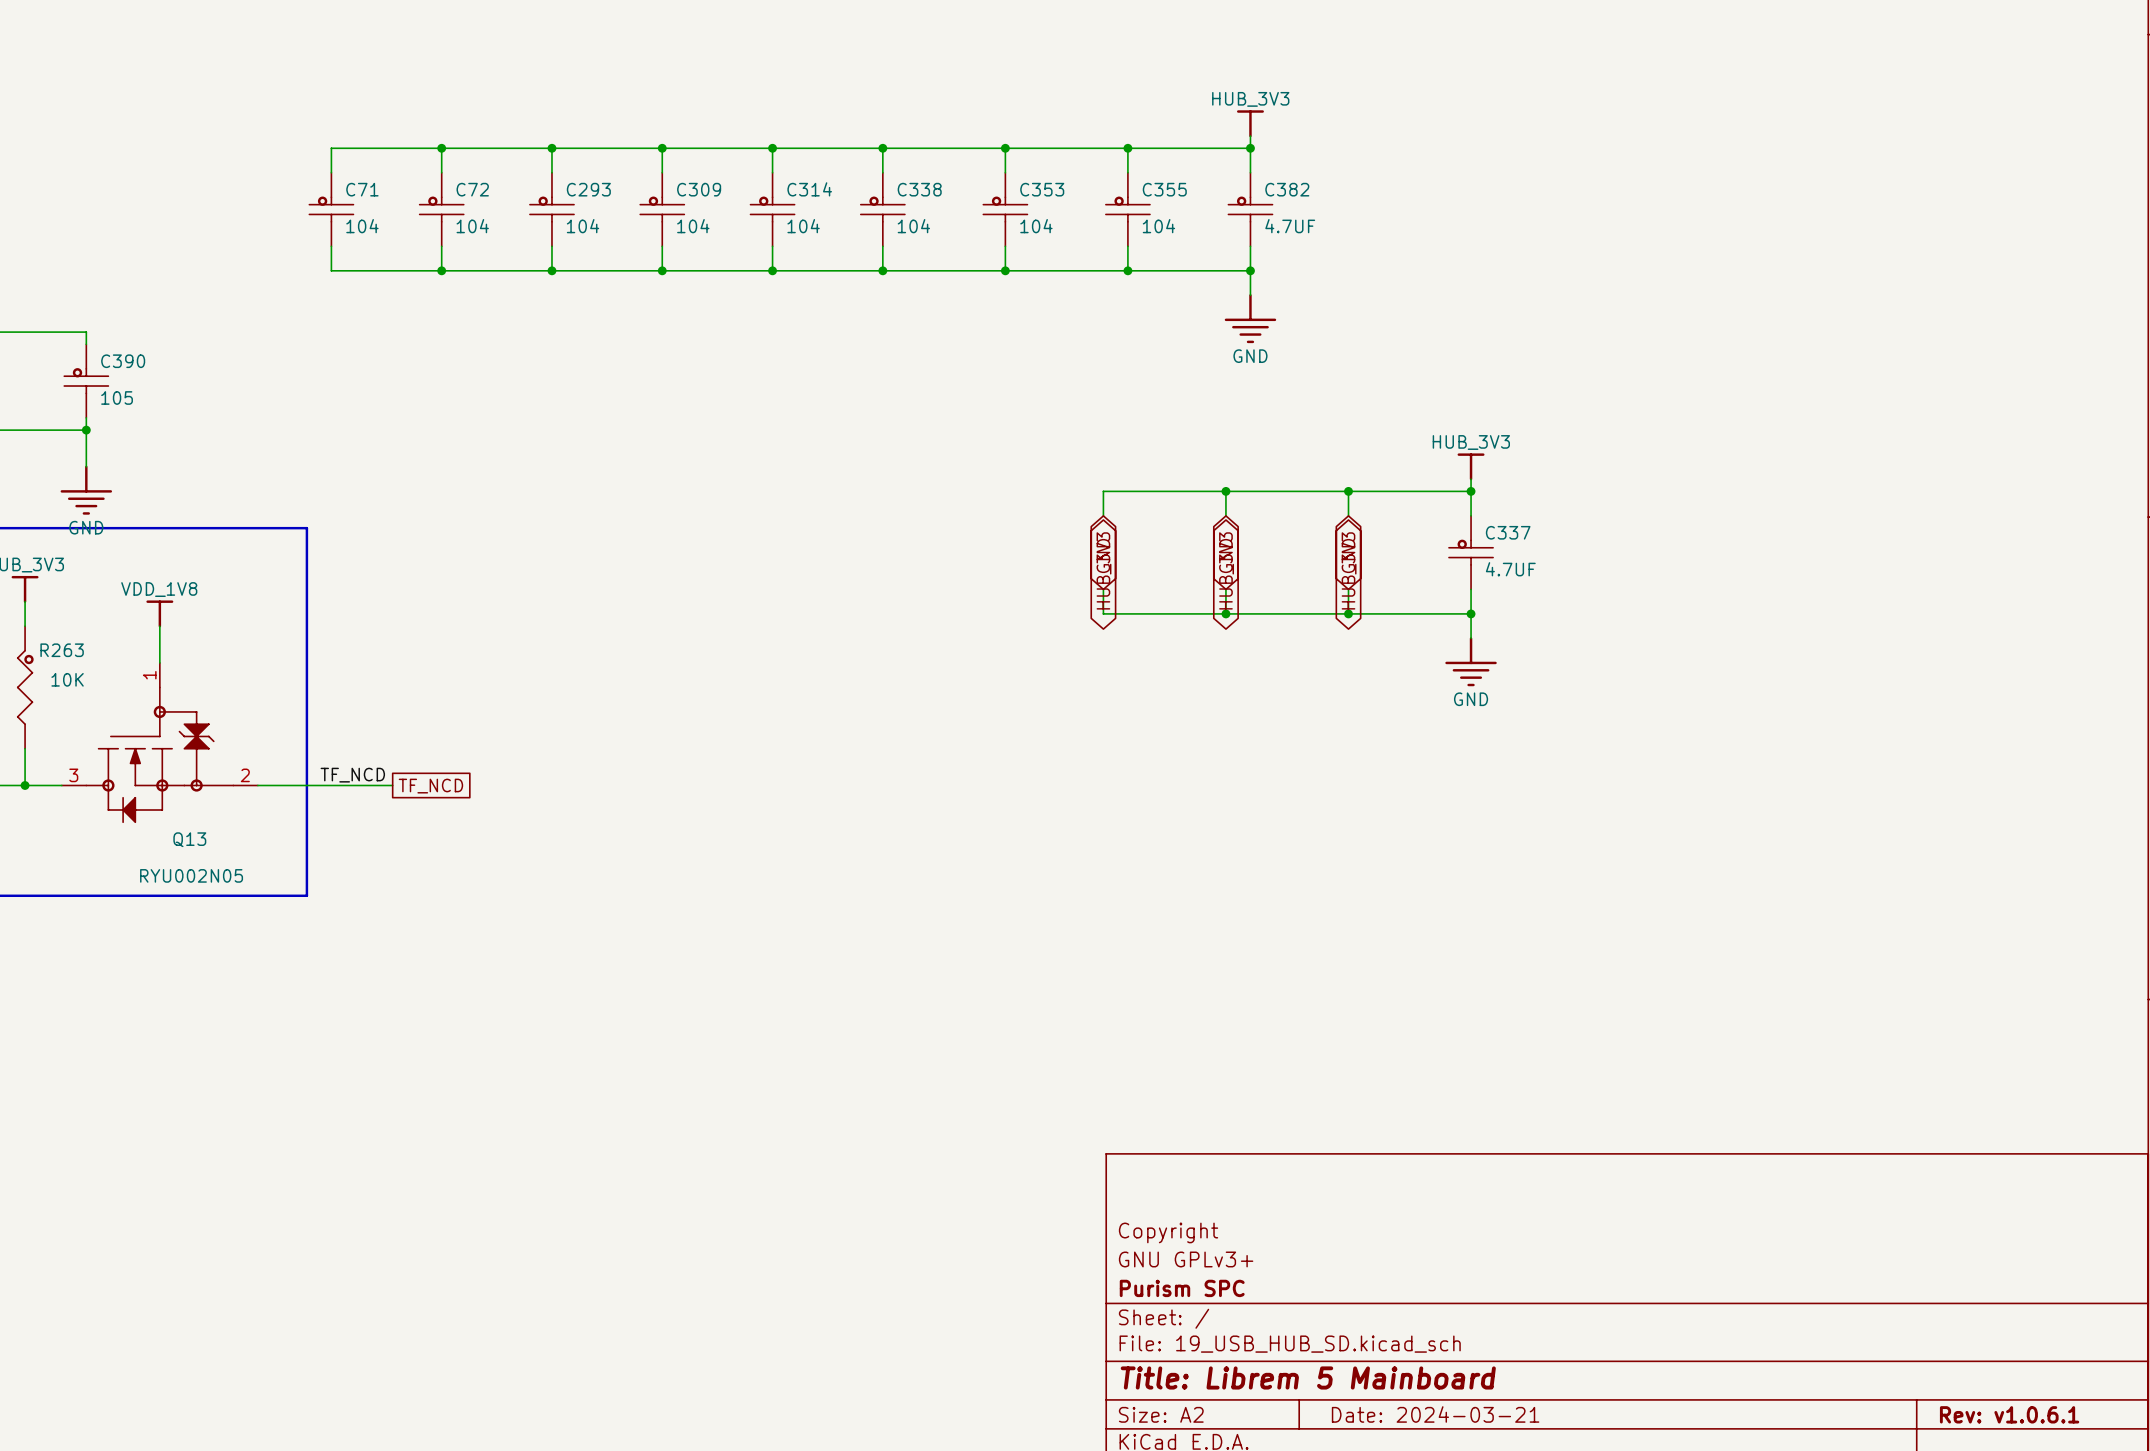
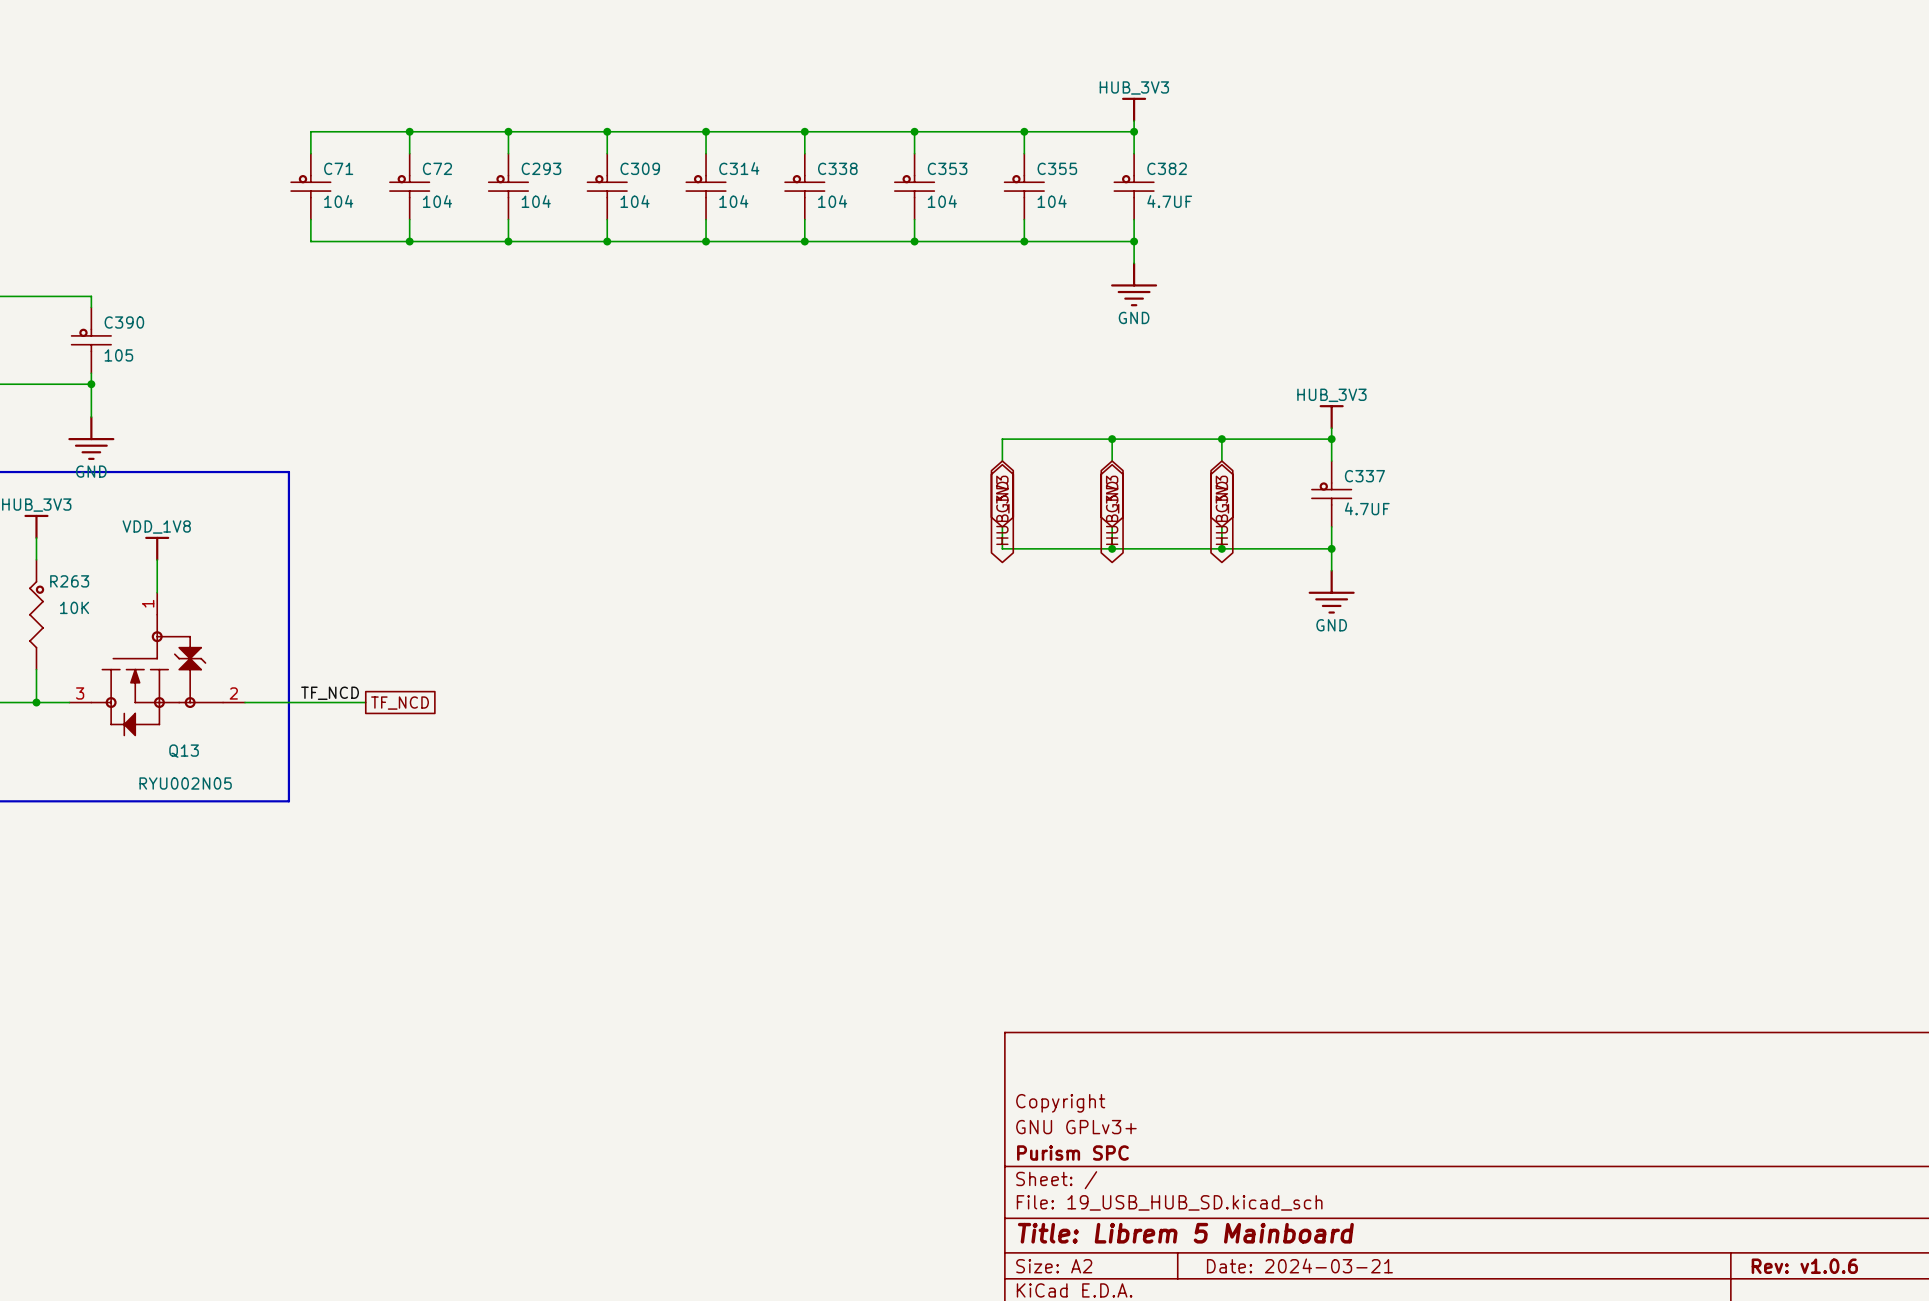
title block: Rev: v1.0.6.1 (2009, 1414) -> Rev: v1.0.6 (1804, 1266)

